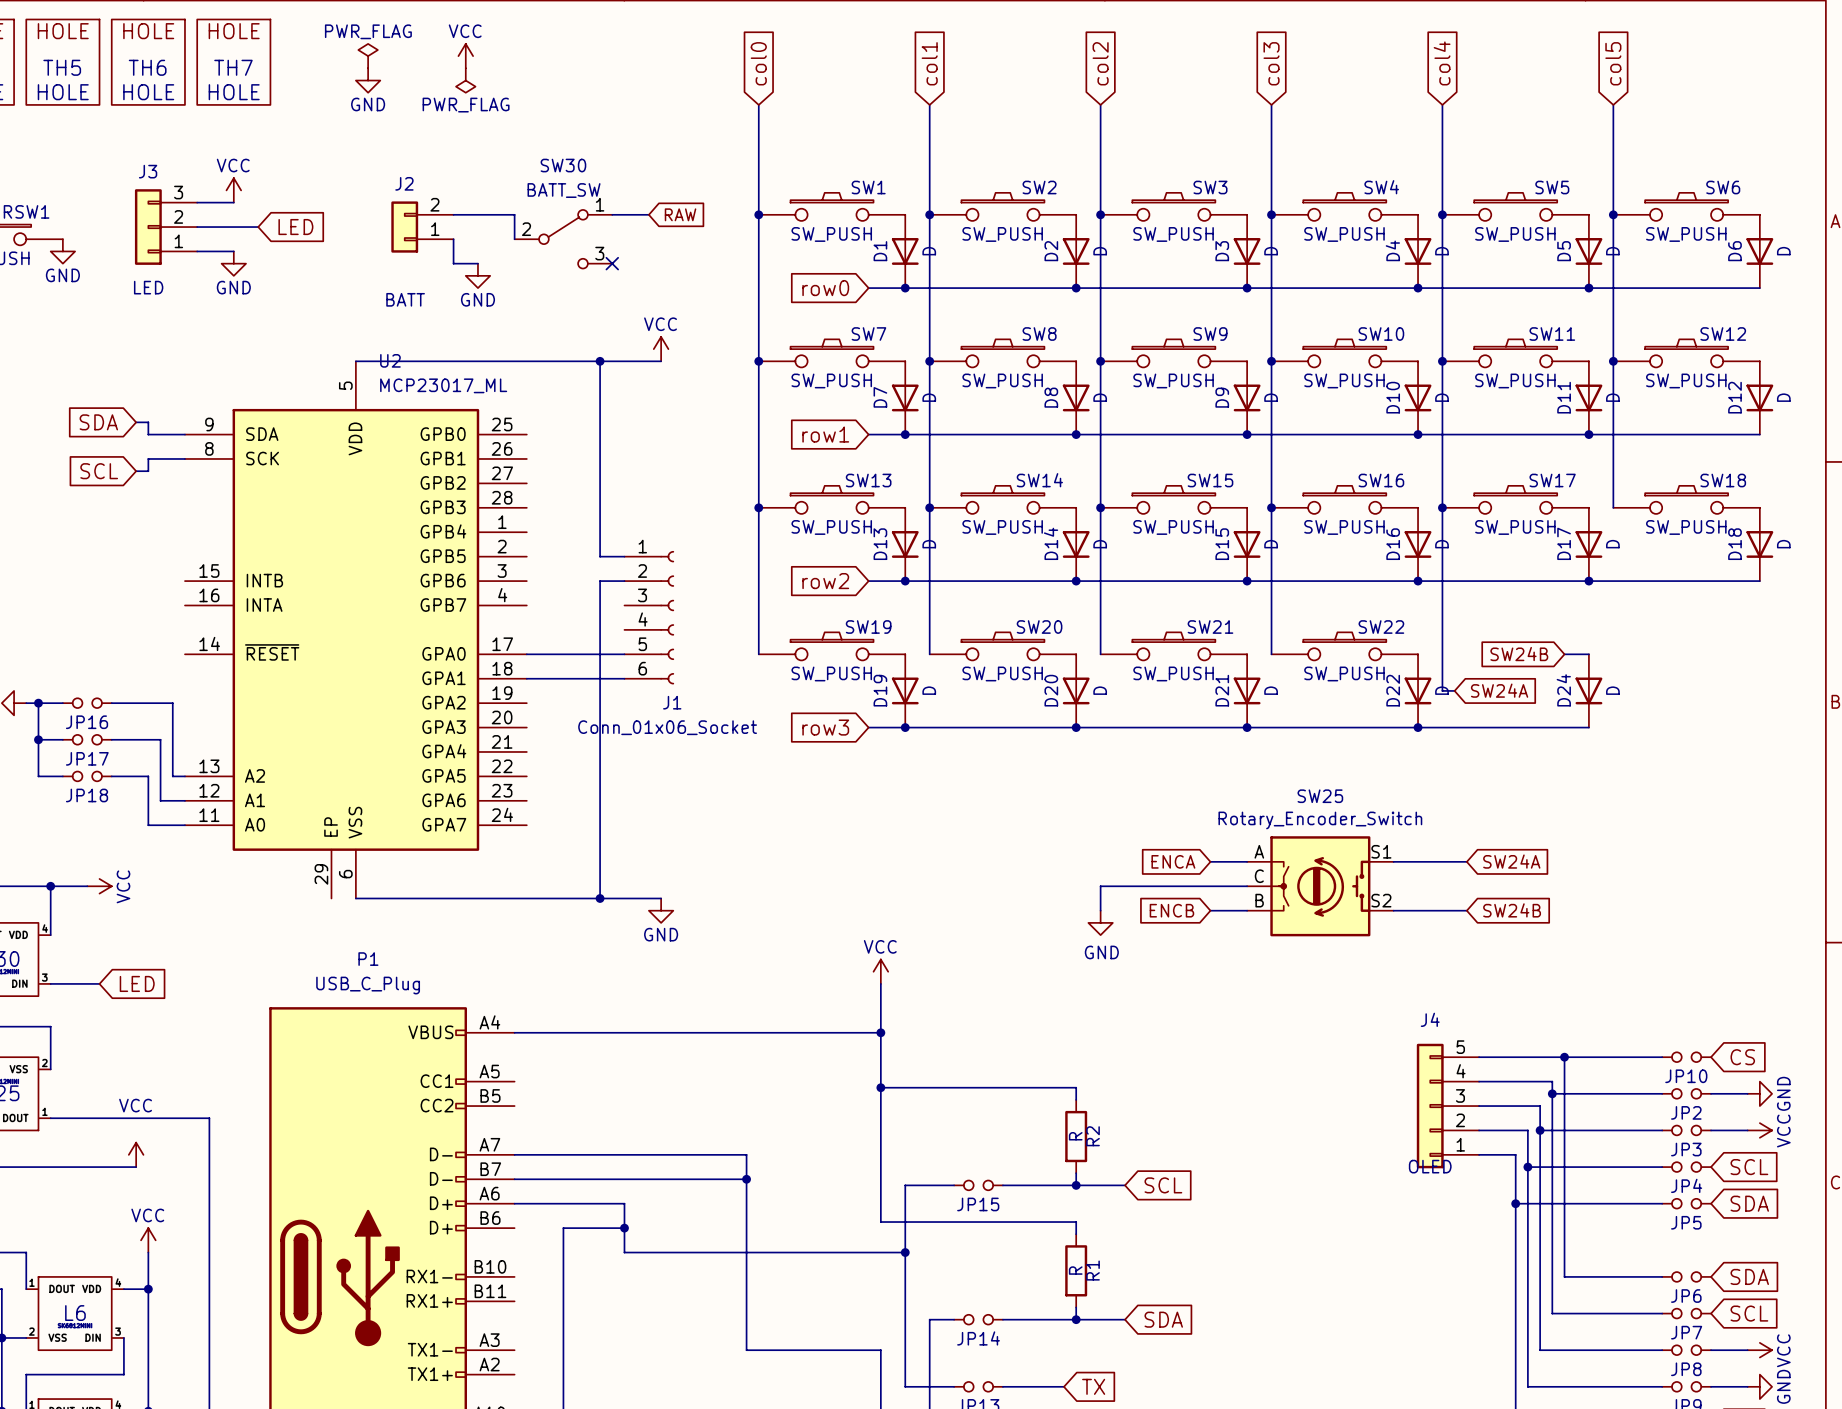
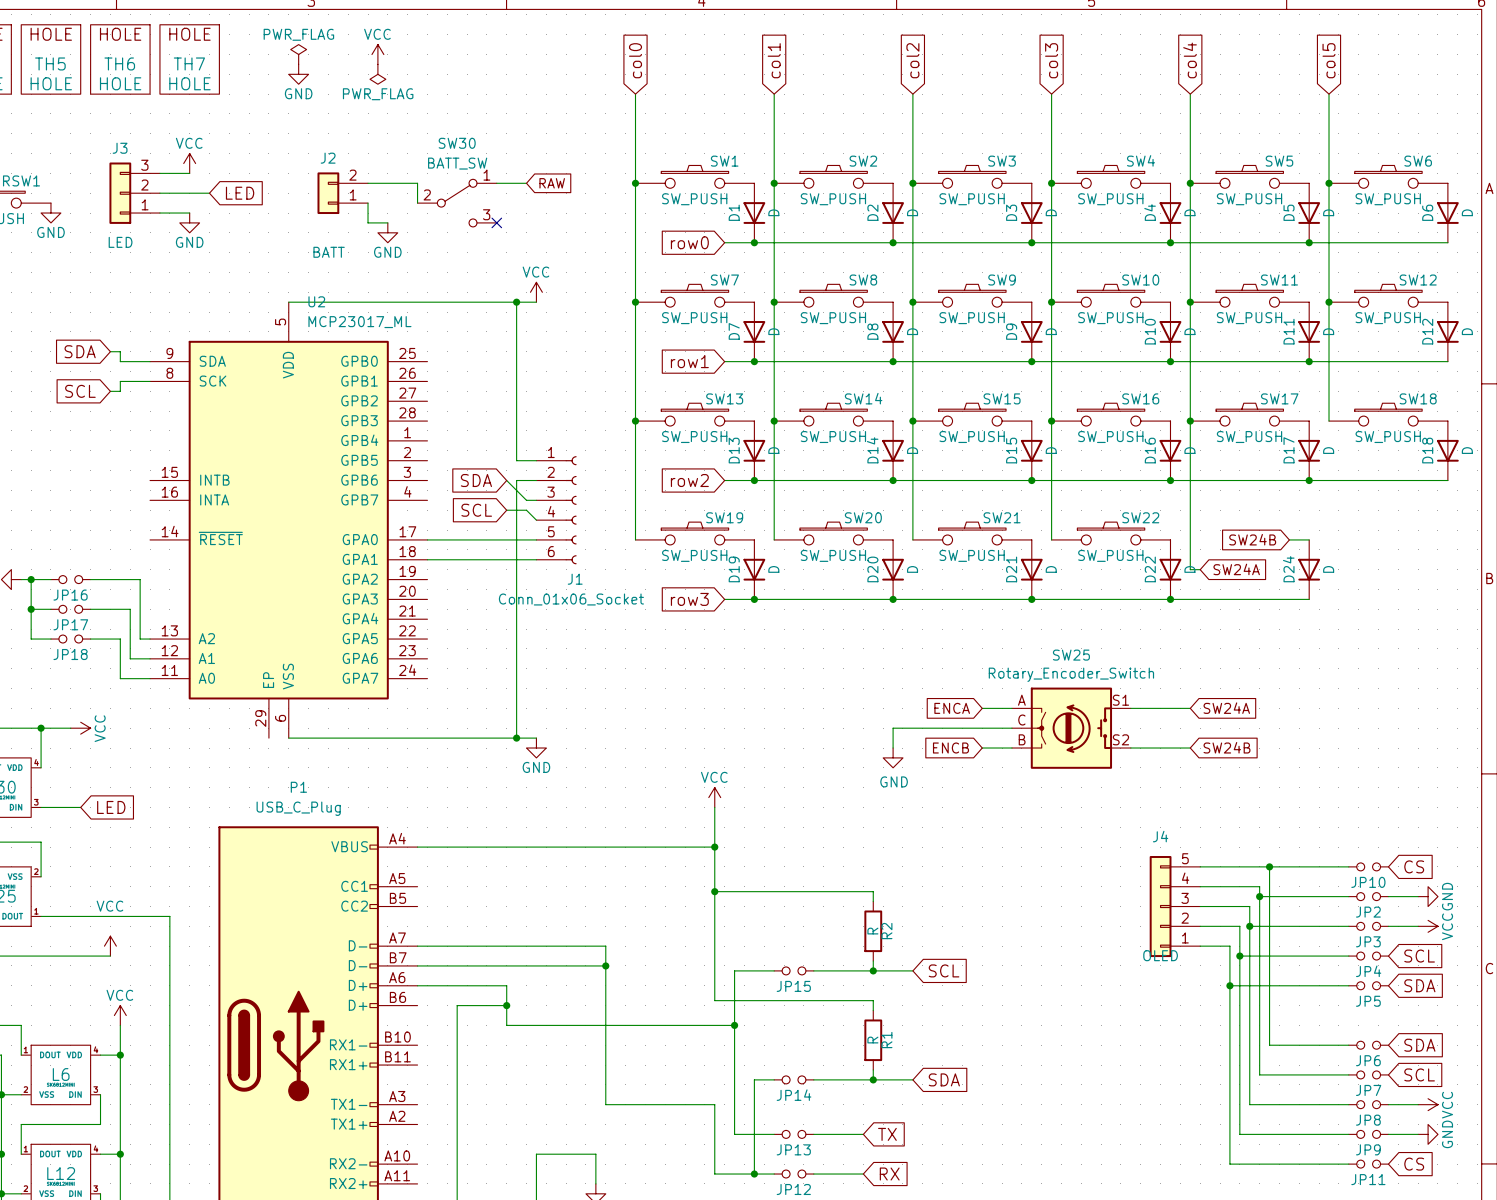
global label position: col0 (758, 63) -> col0 (635, 60)
global label position: col1 (929, 63) -> col1 (774, 60)
global label position: col2 (1100, 63) -> col2 (912, 60)
global label position: col3 (1271, 63) -> col3 (1051, 60)
global label position: col4 (1442, 63) -> col4 (1190, 60)
global label position: col5 (1613, 63) -> col5 (1329, 60)
wire: (758, 104) (758, 654) -> (635, 94) (635, 539)
wire: (929, 104) (929, 654) -> (774, 94) (774, 539)
wire: (1100, 104) (1100, 654) -> (912, 94) (912, 539)
wire: (1271, 104) (1271, 654) -> (1051, 94) (1051, 539)
wire: (1442, 104) (1442, 690) (1454, 690) -> (1190, 94) (1190, 569) (1200, 569)
wire: (1613, 104) (1613, 507) -> (1329, 94) (1329, 421)
SW1 position: (832, 206) -> (694, 176)
SW2 position: (1002, 206) -> (833, 176)
SW3 position: (1173, 206) -> (972, 176)
SW4 position: (1344, 206) -> (1111, 176)
SW5 position: (1515, 206) -> (1249, 176)
SW6 position: (1686, 206) -> (1388, 176)
junction position: (758, 214) -> (635, 183)
junction position: (929, 214) -> (774, 183)
junction position: (1100, 214) -> (912, 183)
junction position: (1271, 214) -> (1051, 183)
junction position: (1442, 214) -> (1190, 183)
junction position: (1613, 214) -> (1329, 183)
D1 position: (905, 251) -> (754, 213)
D2 position: (1076, 251) -> (893, 213)
D3 position: (1247, 251) -> (1031, 213)
D4 position: (1418, 251) -> (1170, 213)
D5 position: (1588, 251) -> (1309, 213)
D6 position: (1759, 251) -> (1447, 213)
global label position: row0 (825, 288) -> row0 (689, 242)
wire: (868, 288) (893, 288) -> none
junction position: (905, 288) -> (754, 242)
junction position: (1076, 288) -> (893, 242)
junction position: (1247, 288) -> (1031, 242)
junction position: (1418, 288) -> (1170, 242)
junction position: (1588, 288) -> (1309, 242)
wire: none -> (1428, 242) (1447, 242)
SW7 position: (832, 353) -> (694, 295)
SW8 position: (1002, 353) -> (833, 295)
SW9 position: (1173, 353) -> (972, 295)
SW10 position: (1344, 353) -> (1111, 295)
SW11 position: (1515, 353) -> (1249, 295)
SW12 position: (1686, 353) -> (1388, 295)
wire: (600, 361) (600, 556) (624, 556) -> (516, 302) (516, 460) (536, 460)
junction position: (600, 361) -> (516, 302)
junction position: (758, 361) -> (635, 302)
junction position: (929, 361) -> (774, 302)
junction position: (1100, 361) -> (912, 302)
junction position: (1271, 361) -> (1051, 302)
junction position: (1442, 361) -> (1190, 302)
junction position: (1613, 361) -> (1329, 302)
D7 position: (905, 397) -> (754, 331)
D8 position: (1076, 397) -> (893, 331)
D9 position: (1247, 397) -> (1031, 331)
D10 position: (1418, 397) -> (1170, 331)
D11 position: (1588, 397) -> (1309, 331)
D12 position: (1759, 397) -> (1447, 331)
global label position: row1 (825, 434) -> row1 (689, 361)
wire: (868, 434) (893, 434) -> none
junction position: (905, 434) -> (754, 361)
junction position: (1076, 434) -> (893, 361)
junction position: (1247, 434) -> (1031, 361)
junction position: (1418, 434) -> (1170, 361)
junction position: (1588, 434) -> (1309, 361)
wire: none -> (1428, 361) (1447, 361)
SW13 position: (832, 499) -> (694, 414)
SW14 position: (1002, 499) -> (833, 414)
SW15 position: (1173, 499) -> (972, 414)
SW16 position: (1344, 499) -> (1111, 414)
SW17 position: (1515, 499) -> (1249, 414)
SW18 position: (1686, 499) -> (1388, 414)
junction position: (758, 507) -> (635, 421)
junction position: (929, 507) -> (774, 421)
junction position: (1100, 507) -> (912, 421)
junction position: (1271, 507) -> (1051, 421)
junction position: (1442, 507) -> (1190, 421)
D13 position: (905, 544) -> (754, 450)
D14 position: (1076, 544) -> (893, 450)
D15 position: (1247, 544) -> (1031, 450)
D16 position: (1418, 544) -> (1170, 450)
D17 position: (1588, 544) -> (1309, 450)
D18 position: (1759, 544) -> (1447, 450)
global label: none -> SDA (476, 480)
wire: (624, 581) (600, 581) (600, 898) -> (506, 480) (526, 500) (536, 500)
wire: none -> (536, 480) (516, 480) (516, 738)
global label position: row2 (825, 581) -> row2 (689, 480)
wire: (868, 581) (893, 581) -> none
junction position: (905, 581) -> (754, 480)
junction position: (1076, 581) -> (893, 480)
junction position: (1247, 581) -> (1031, 480)
junction position: (1418, 581) -> (1170, 480)
junction position: (1588, 581) -> (1309, 480)
wire: none -> (1428, 480) (1447, 480)
global label: none -> SCL (476, 510)
wire: none -> (506, 510) (526, 510) (536, 520)
J1 position: (649, 617) -> (556, 510)
SW19 position: (832, 646) -> (694, 533)
SW20 position: (1002, 646) -> (833, 533)
SW21 position: (1173, 646) -> (972, 533)
SW22 position: (1344, 646) -> (1111, 533)
global label position: SW24B (1519, 654) -> SW24B (1252, 539)
wire: (1564, 654) (1588, 654) -> (1309, 539) (1289, 539)
D19 position: (905, 690) -> (754, 569)
D20 position: (1076, 690) -> (893, 569)
D21 position: (1247, 690) -> (1031, 569)
D22 position: (1418, 690) -> (1170, 569)
global label position: SW24A (1499, 690) -> SW24A (1236, 569)
D24 position: (1588, 690) -> (1309, 569)
global label position: row3 (825, 727) -> row3 (689, 599)
wire: (868, 727) (893, 727) -> none
junction position: (905, 727) -> (754, 599)
junction position: (1076, 727) -> (893, 599)
junction position: (1247, 727) -> (1031, 599)
junction position: (1418, 727) -> (1170, 599)
wire: none -> (1289, 599) (1309, 599)
junction position: (600, 898) -> (516, 738)

